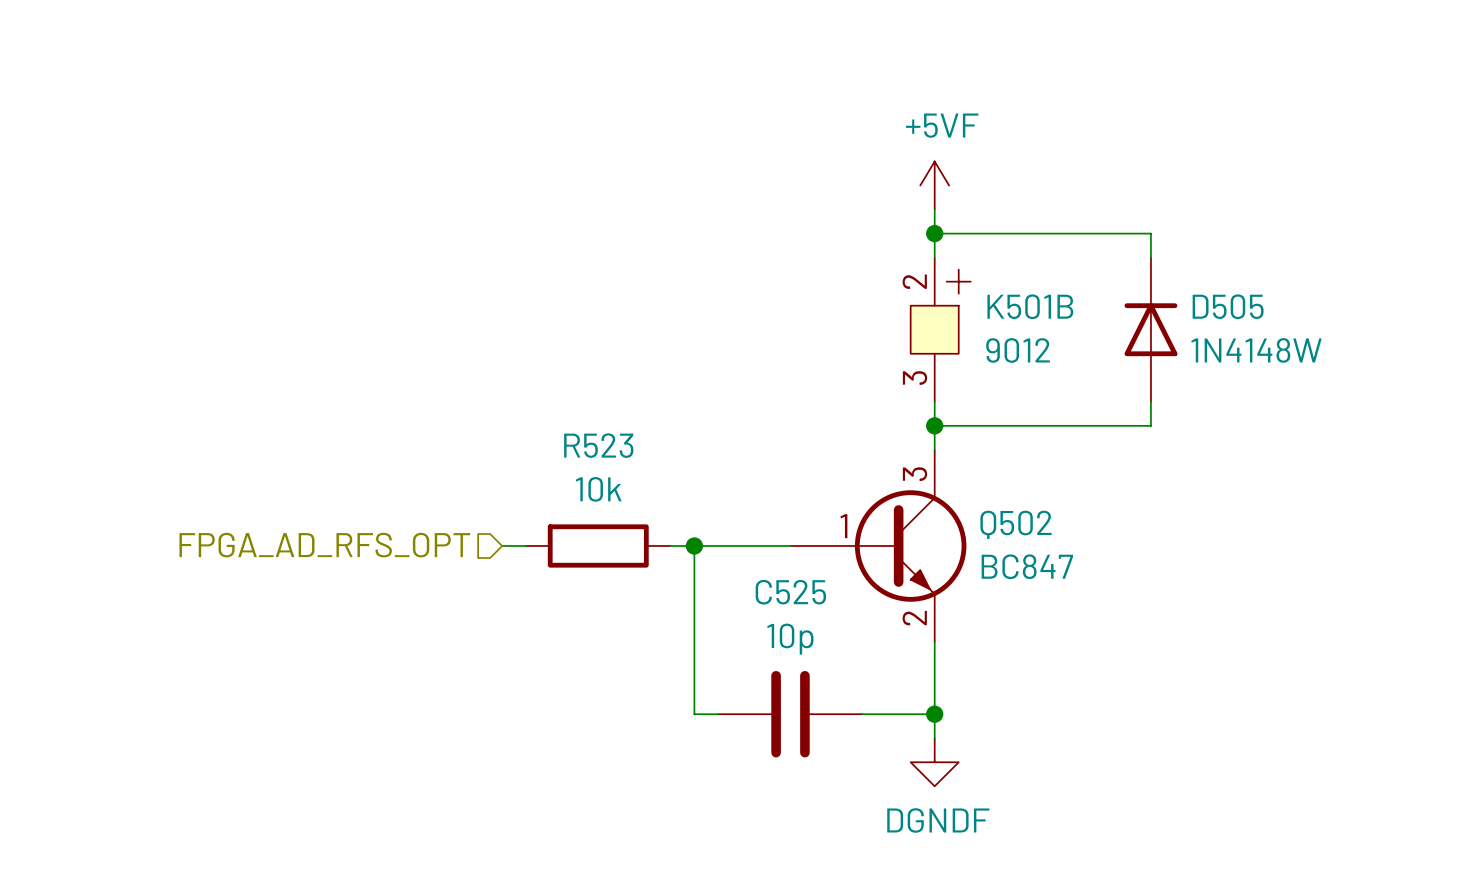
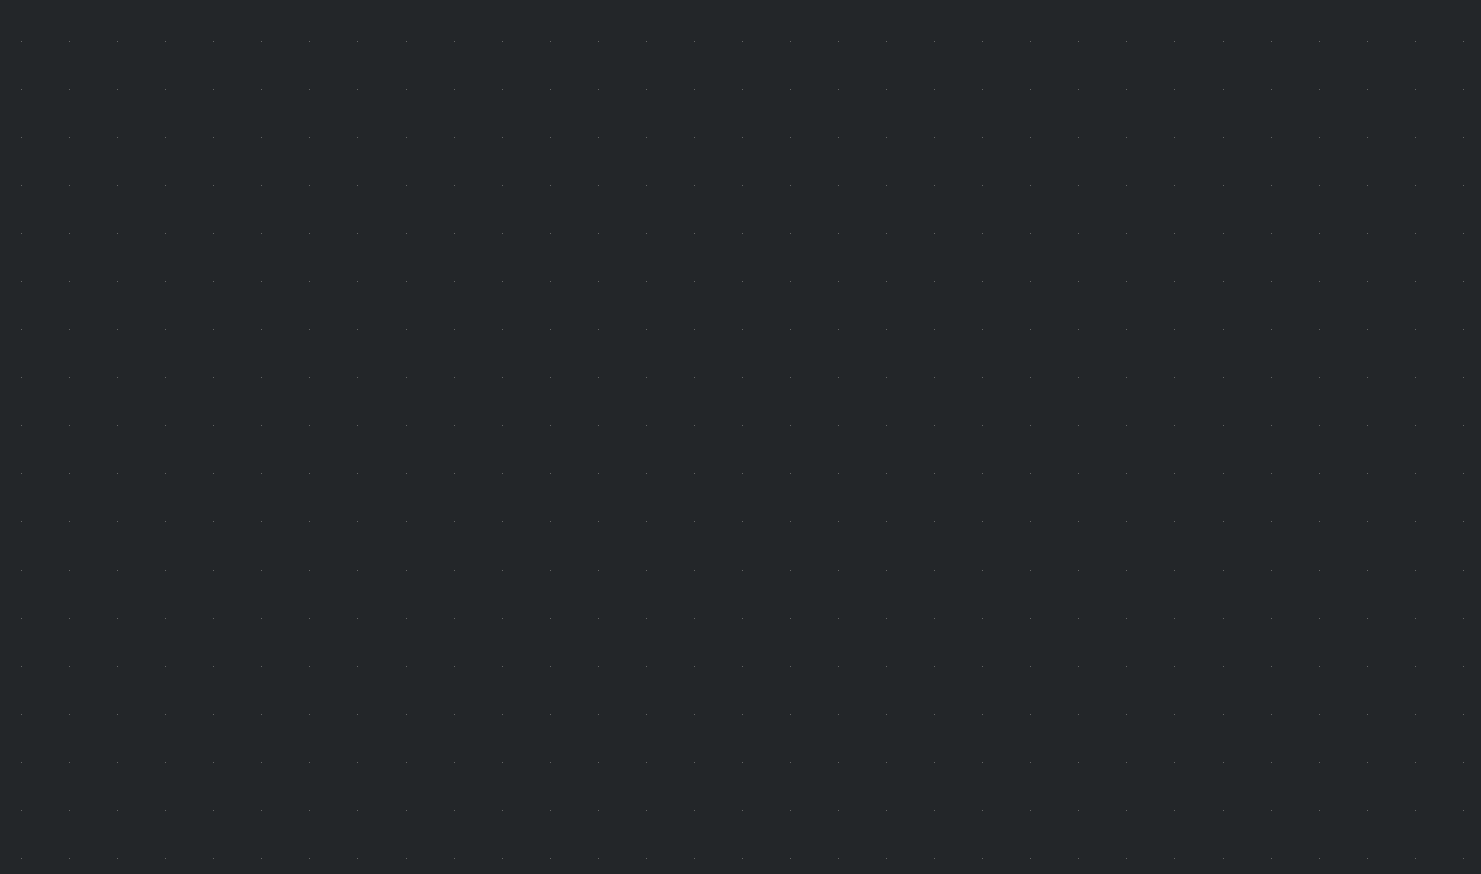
power symbol: +5VF (934, 185) -> none
wire: (934, 209) (934, 257) -> none
wire: (934, 233) (1150, 233) (1150, 257) -> none
junction: (934, 233) -> none
K501B: 9012 (940, 329) -> none
D505: 1N4148W (1150, 329) -> none
wire: (934, 401) (934, 449) -> none
wire: (1150, 401) (1150, 425) (934, 425) -> none
junction: (934, 425) -> none
hierarchical label: FPGA_AD_RFS_OPT (324, 545) -> none
wire: (502, 546) (526, 546) -> none
R523: 10k (598, 546) -> none
wire: (670, 546) (790, 546) -> none
wire: (694, 546) (694, 714) (718, 714) -> none
junction: (694, 546) -> none
Q502: BC847 (878, 546) -> none
wire: (934, 642) (934, 738) -> none
C525: 10p (790, 714) -> none
wire: (862, 714) (934, 714) -> none
junction: (934, 714) -> none
power symbol: DGNDF (934, 762) -> none

